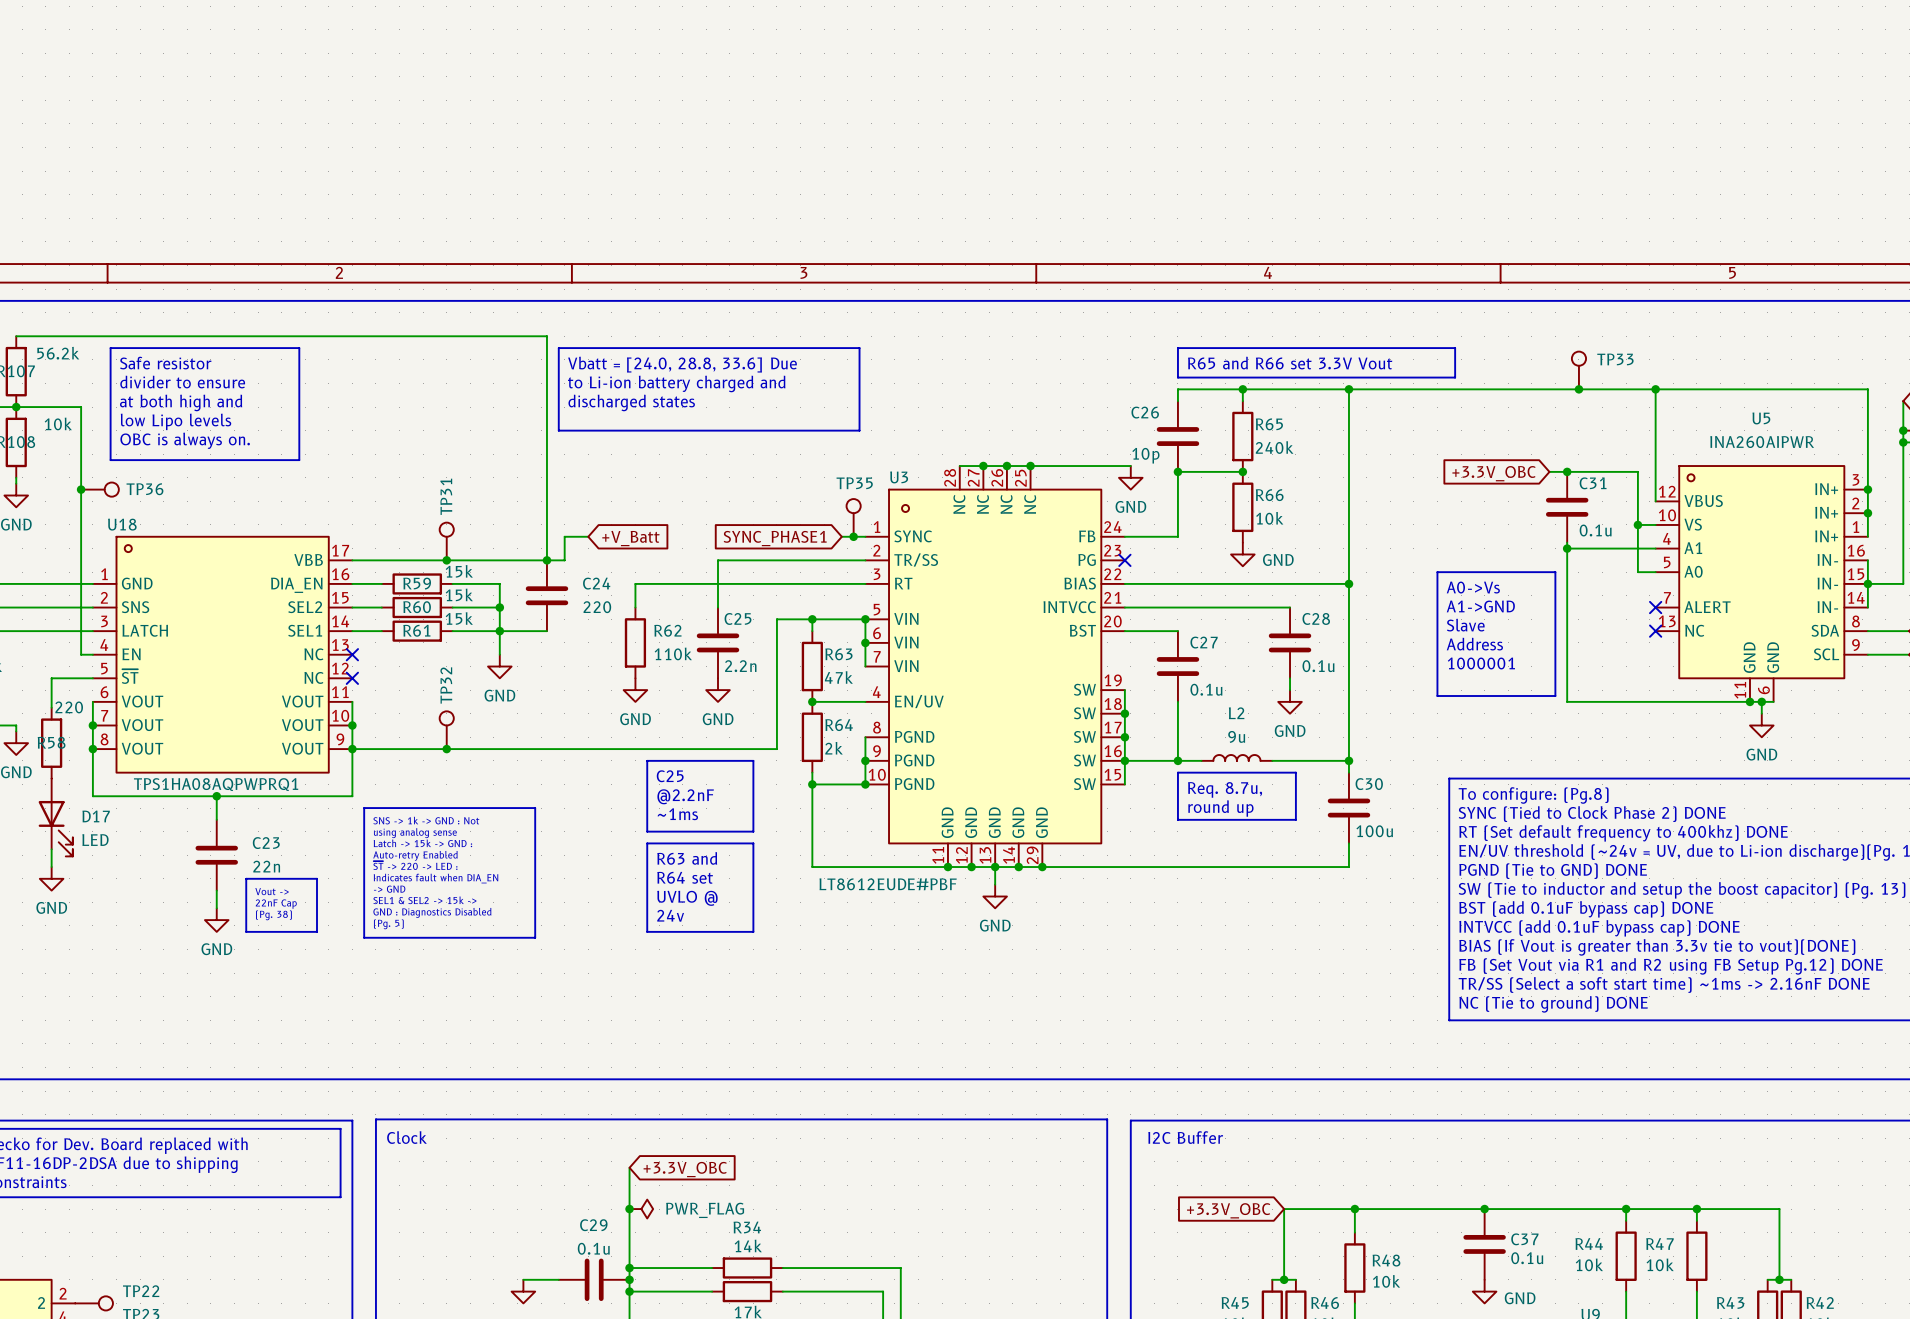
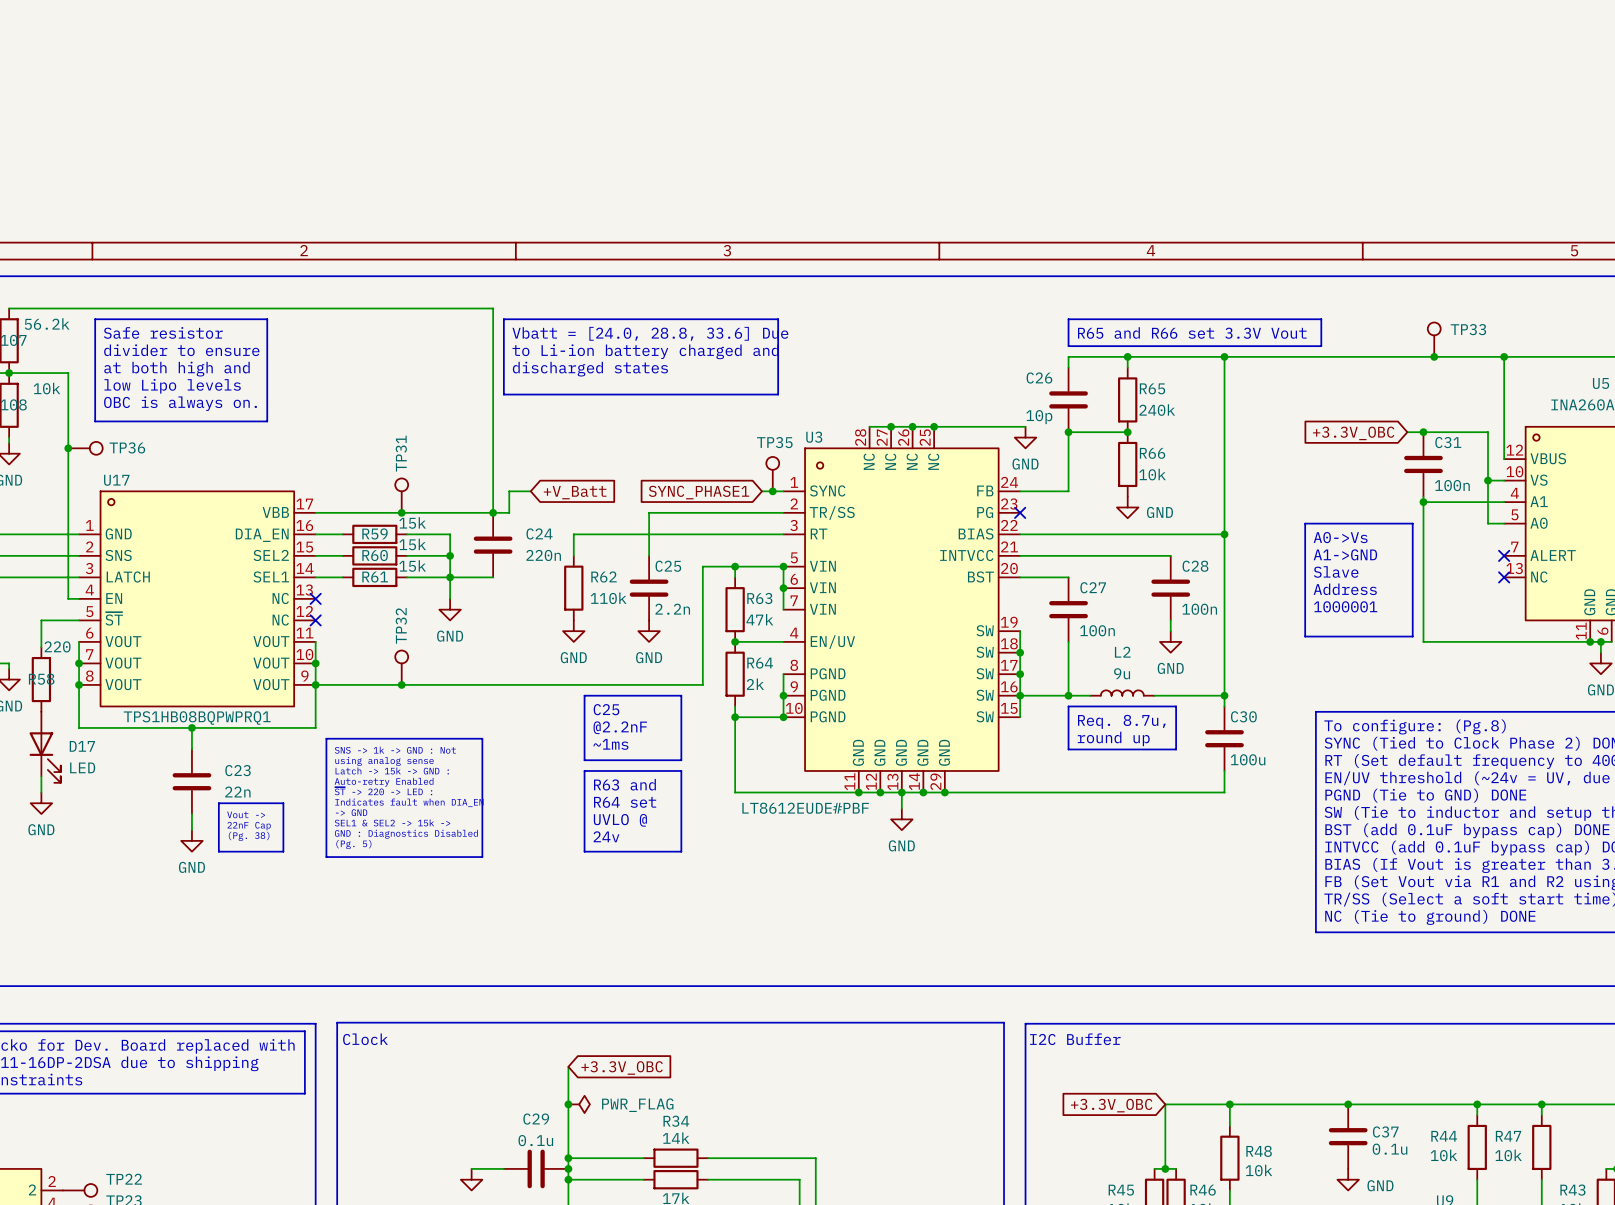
U18 name: U18 (122, 524) -> U17 (116, 480)
C31 value: 0.1u (1595, 530) -> 100n (1452, 485)
C24 value: 220 (597, 607) -> 220n (543, 555)
C28 value: 0.1u (1318, 666) -> 100n (1199, 609)
C27 value: 0.1u (1206, 689) -> 100n (1097, 630)
U18 value: TPS1HA08AQPWPRQ1 (216, 784) -> TPS1HB08BQPWPRQ1 (197, 717)

